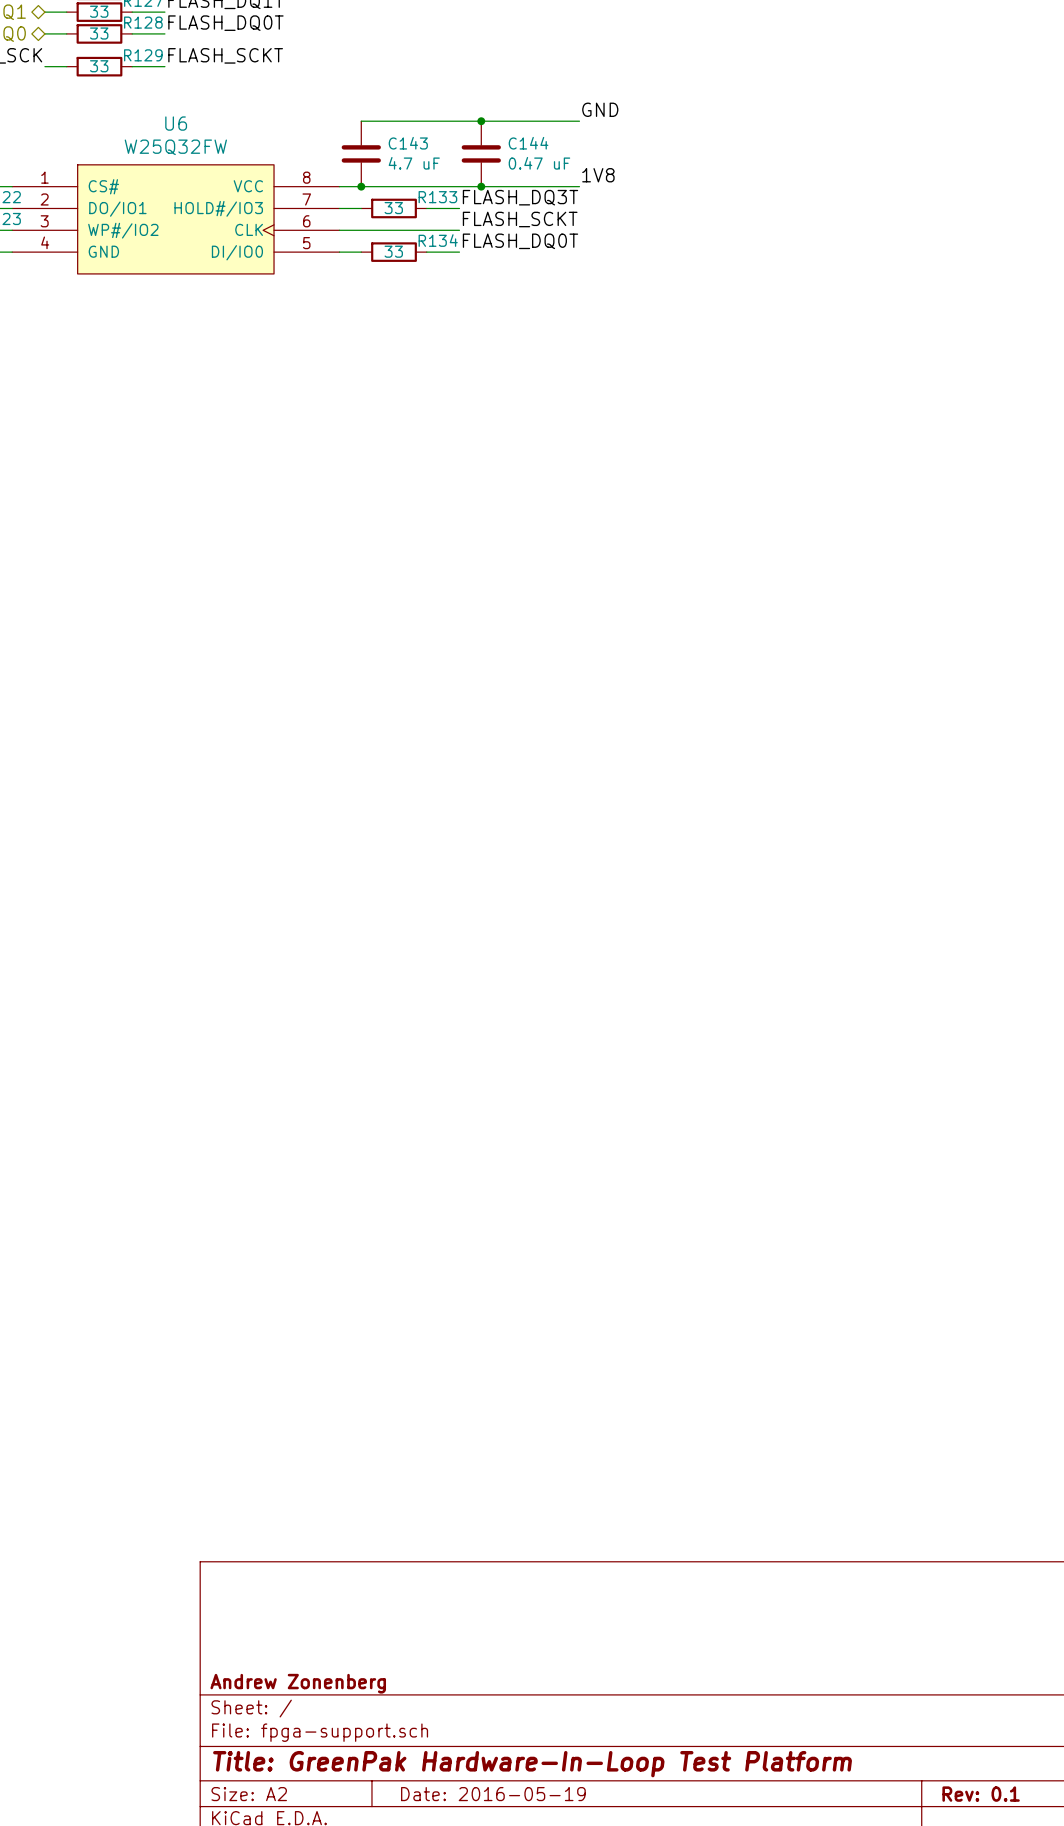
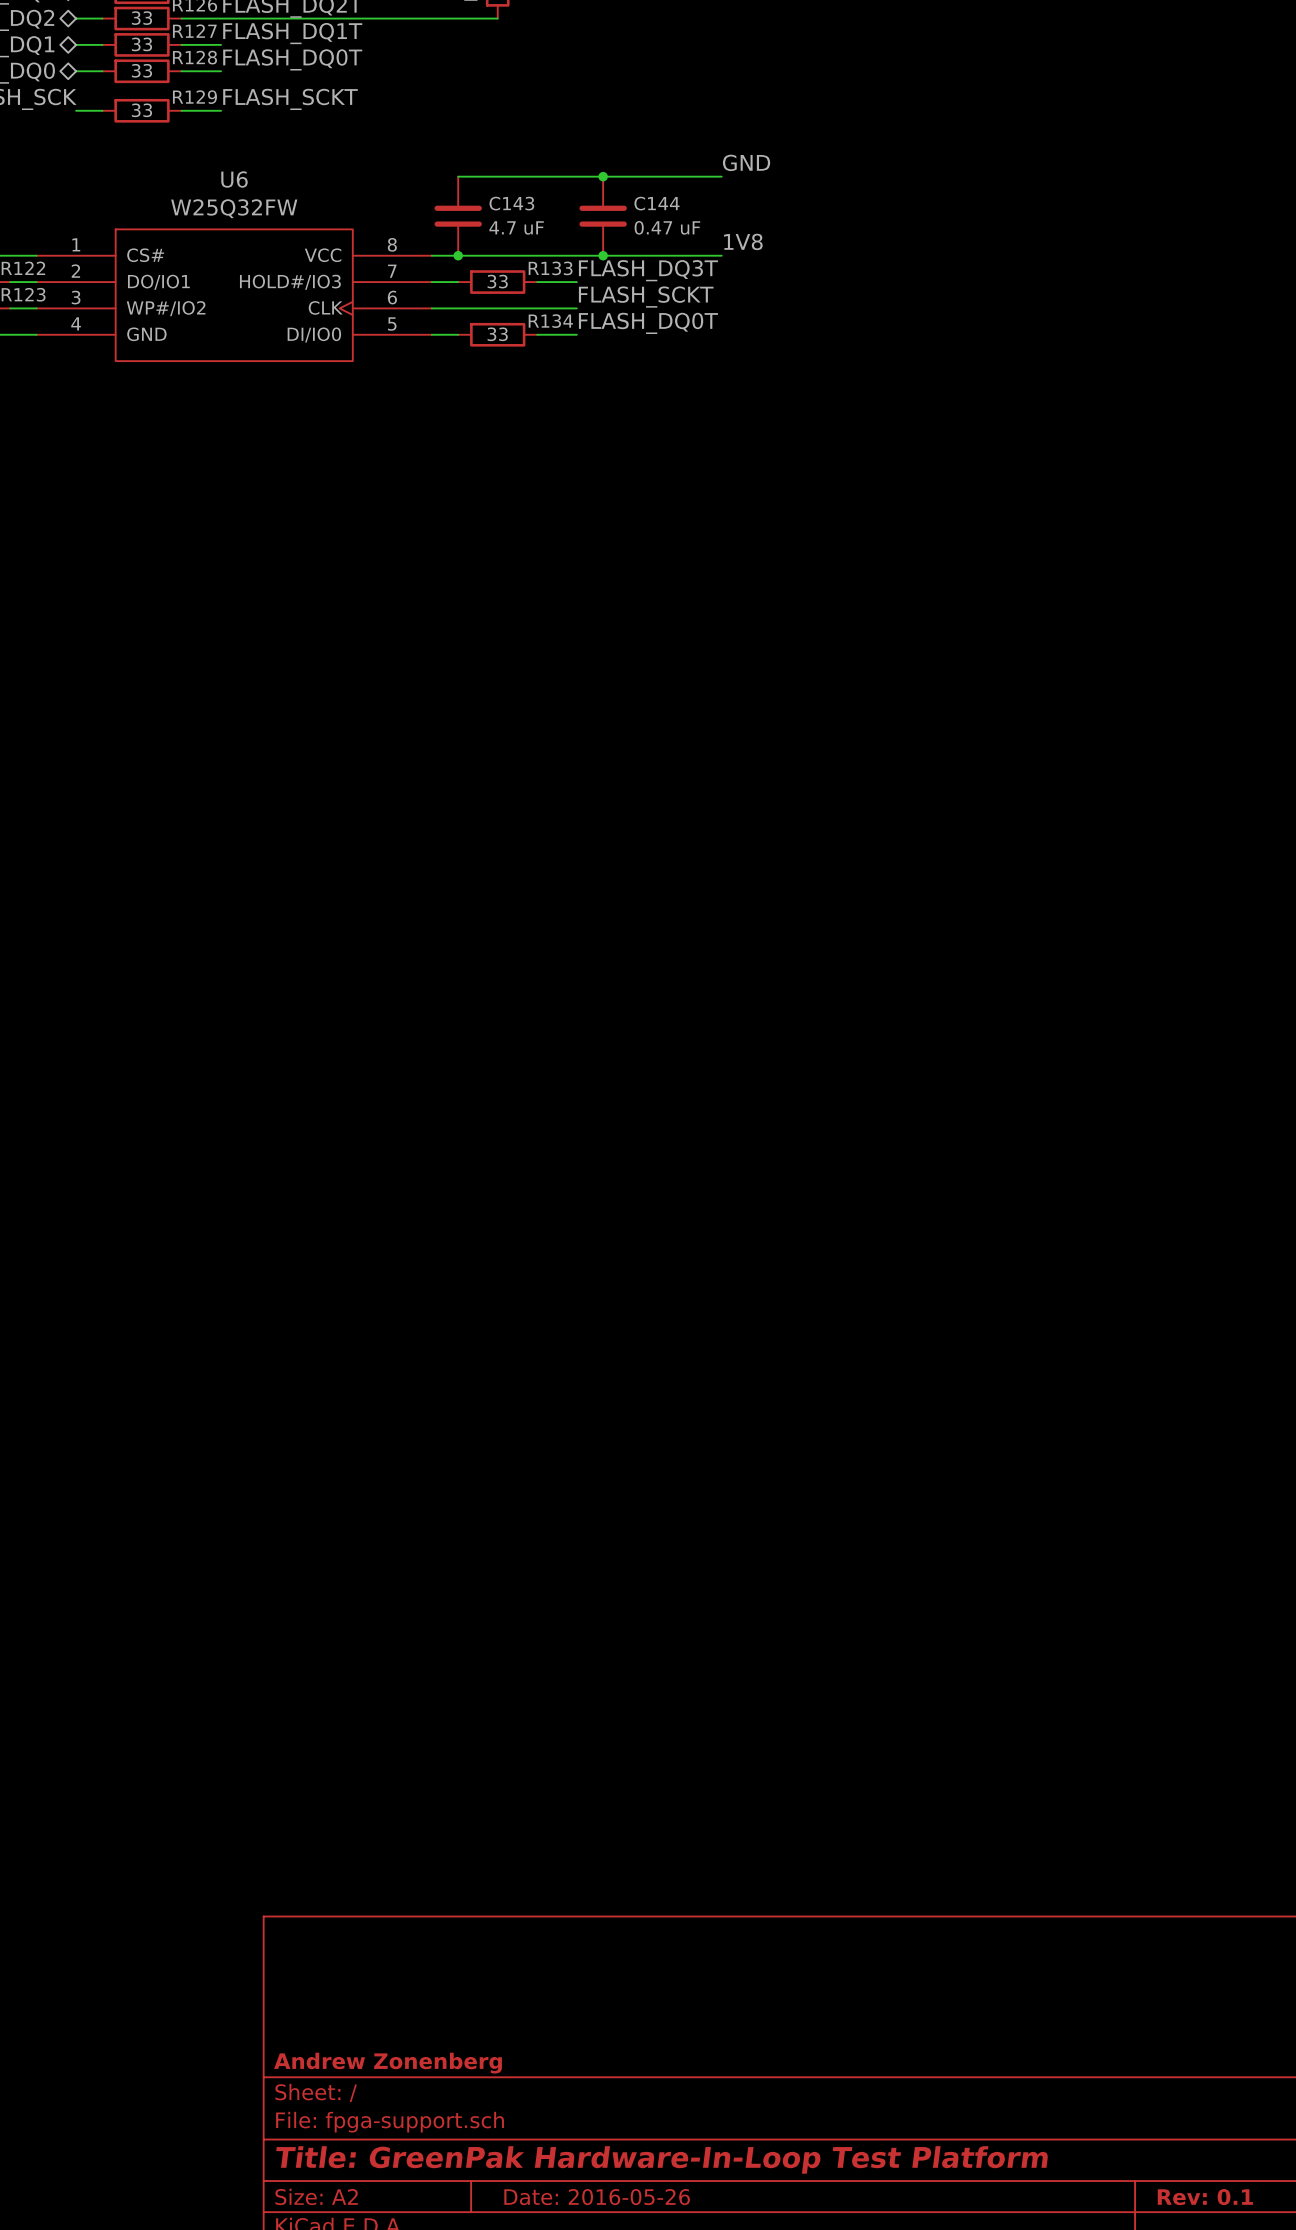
title block: Date: 2016-05-19 (493, 1794) -> Date: 2016-05-26 (597, 2197)

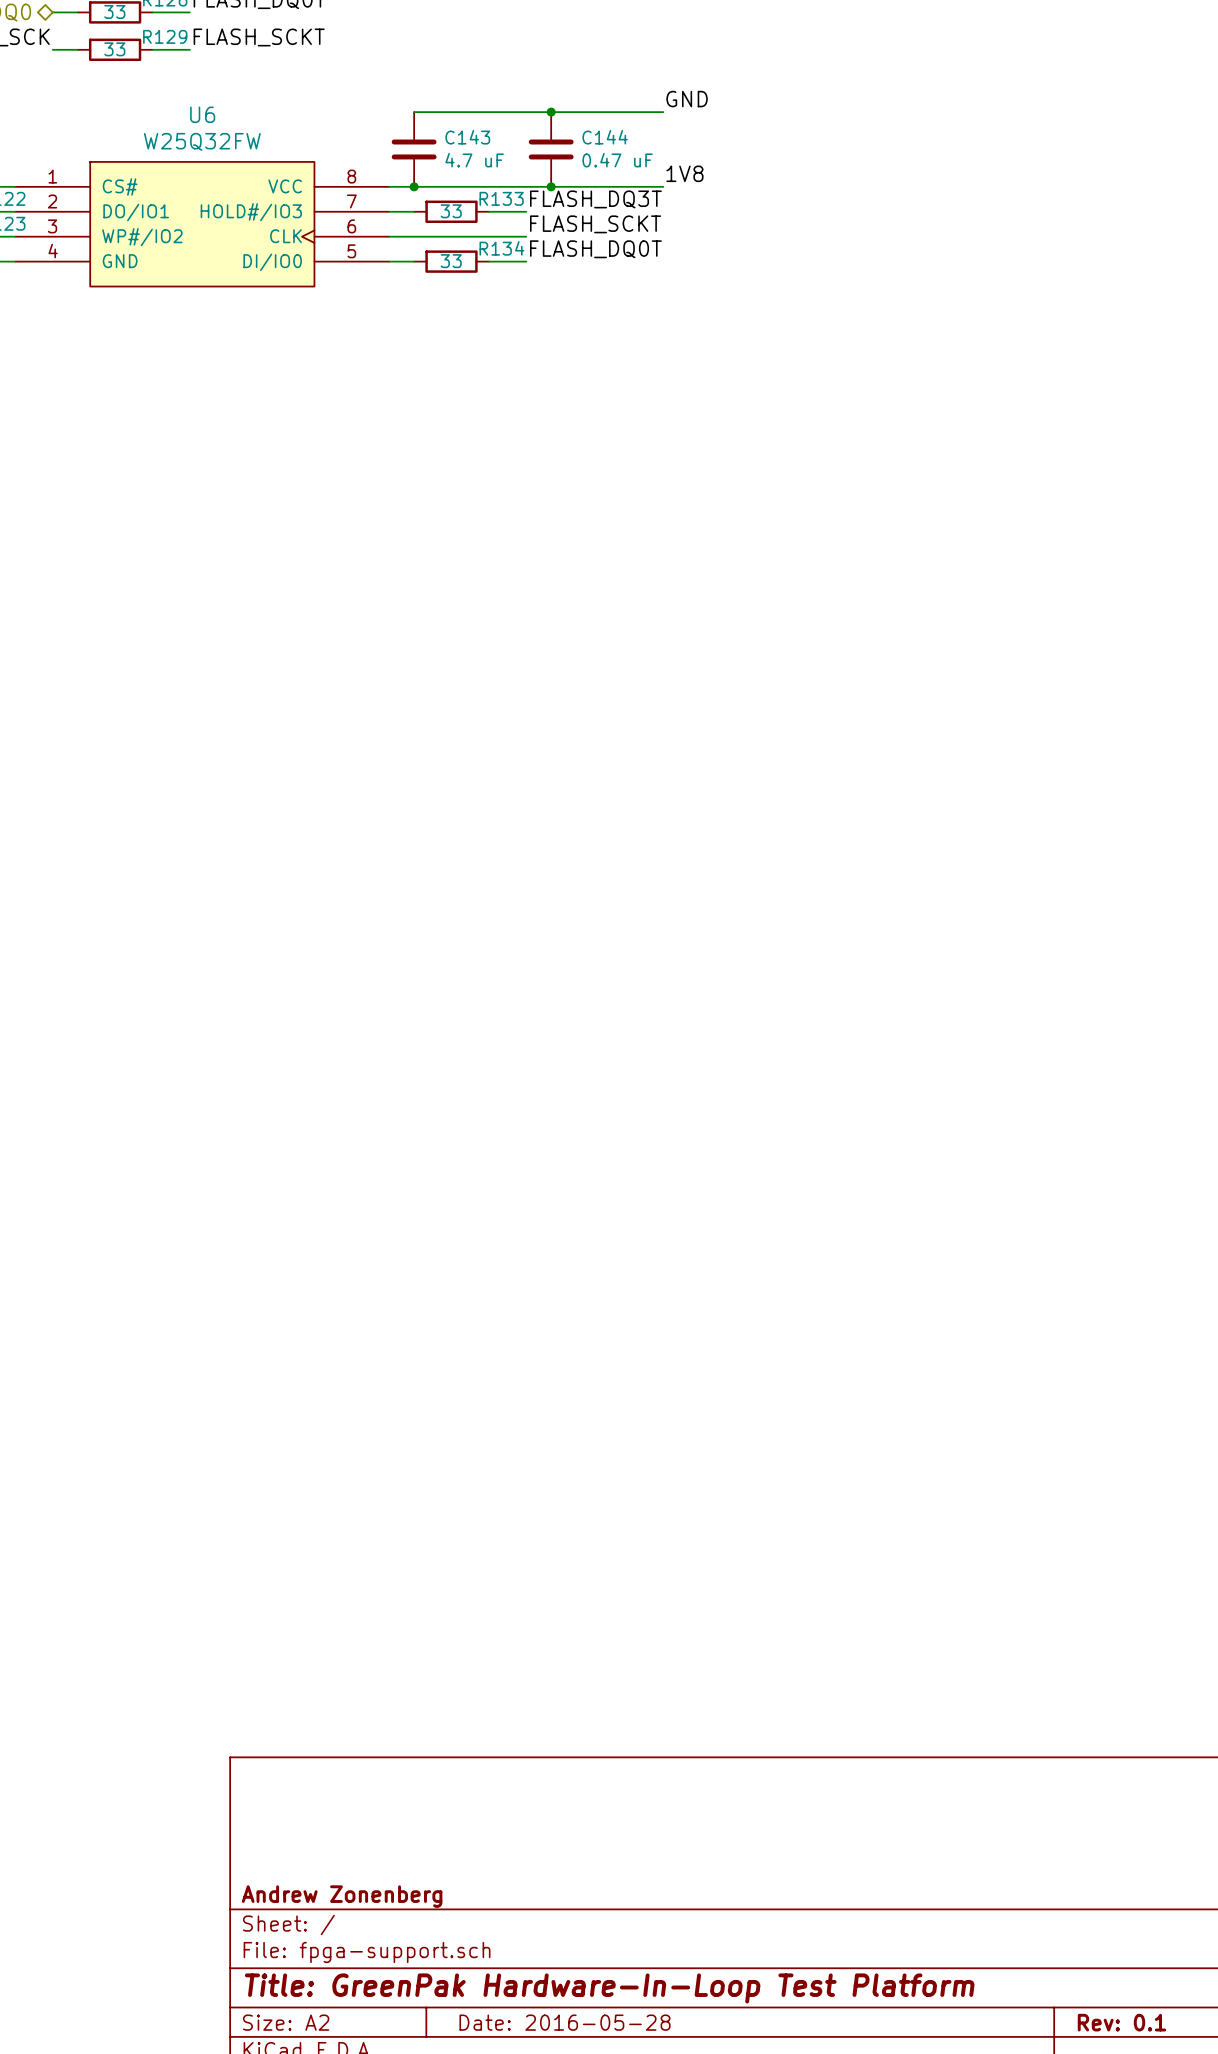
title block: Date: 2016-05-26 (597, 2197) -> Date: 2016-05-28 (565, 2022)

